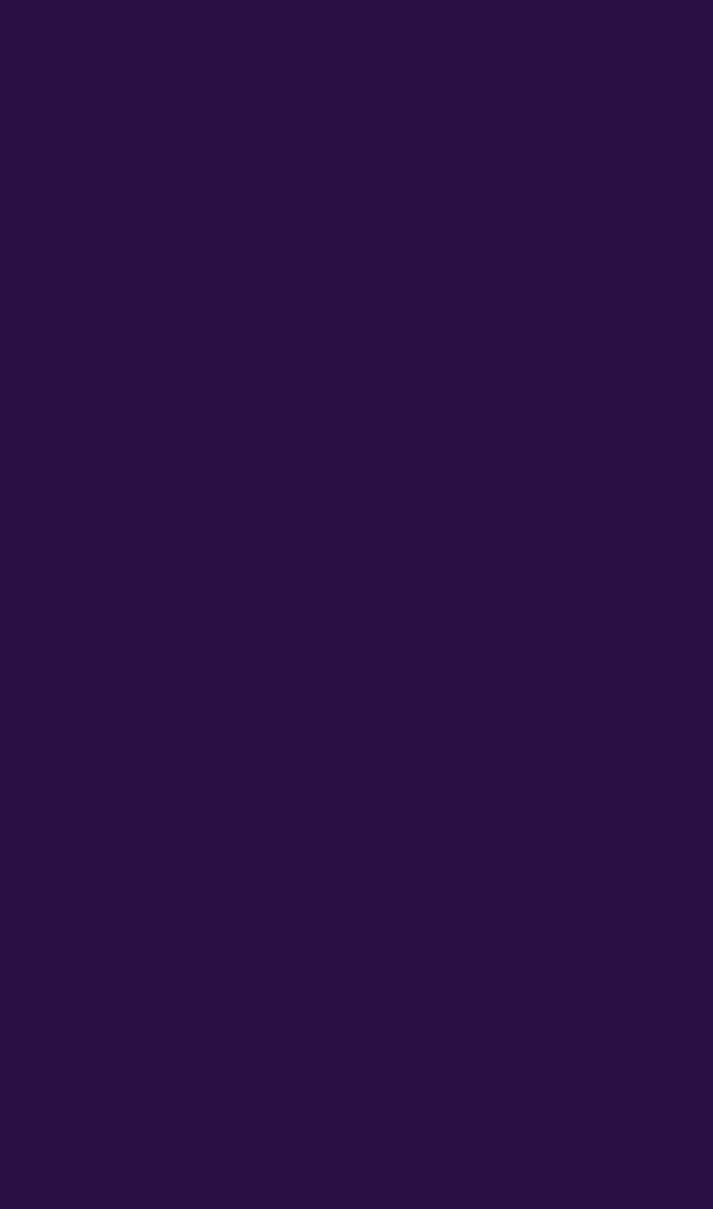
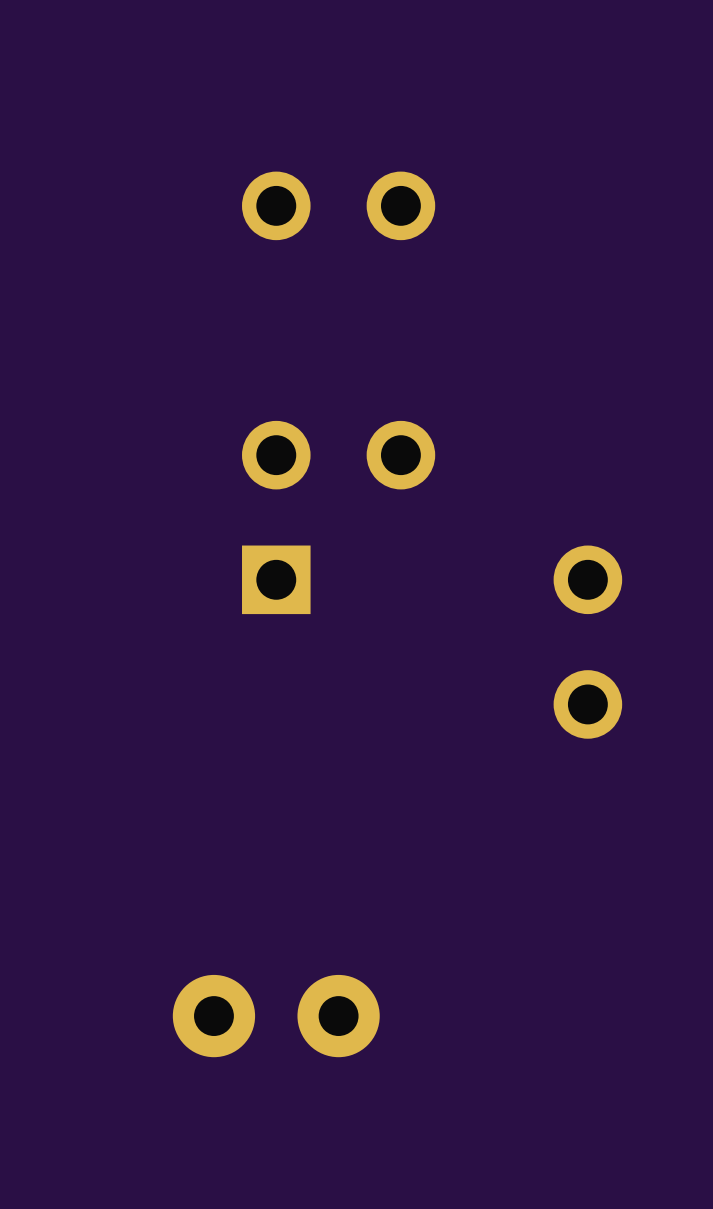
part: none -> (338, 205)
part: none -> (338, 517)
part: none -> (587, 642)
part: none -> (276, 1016)

